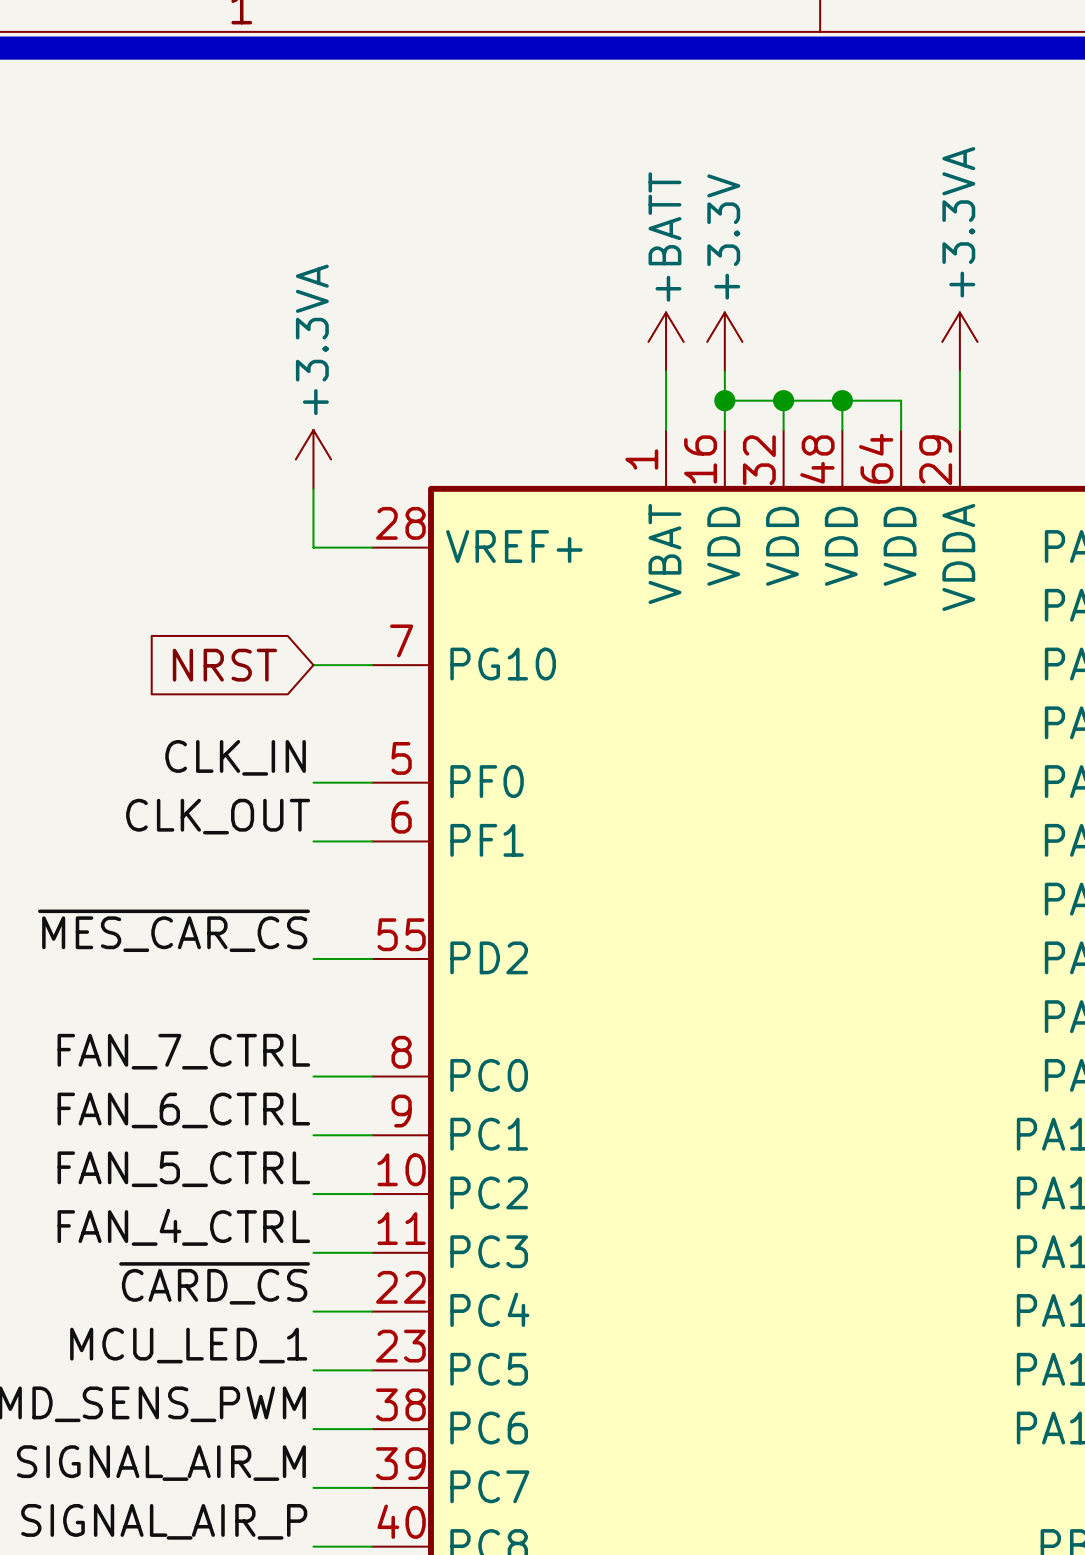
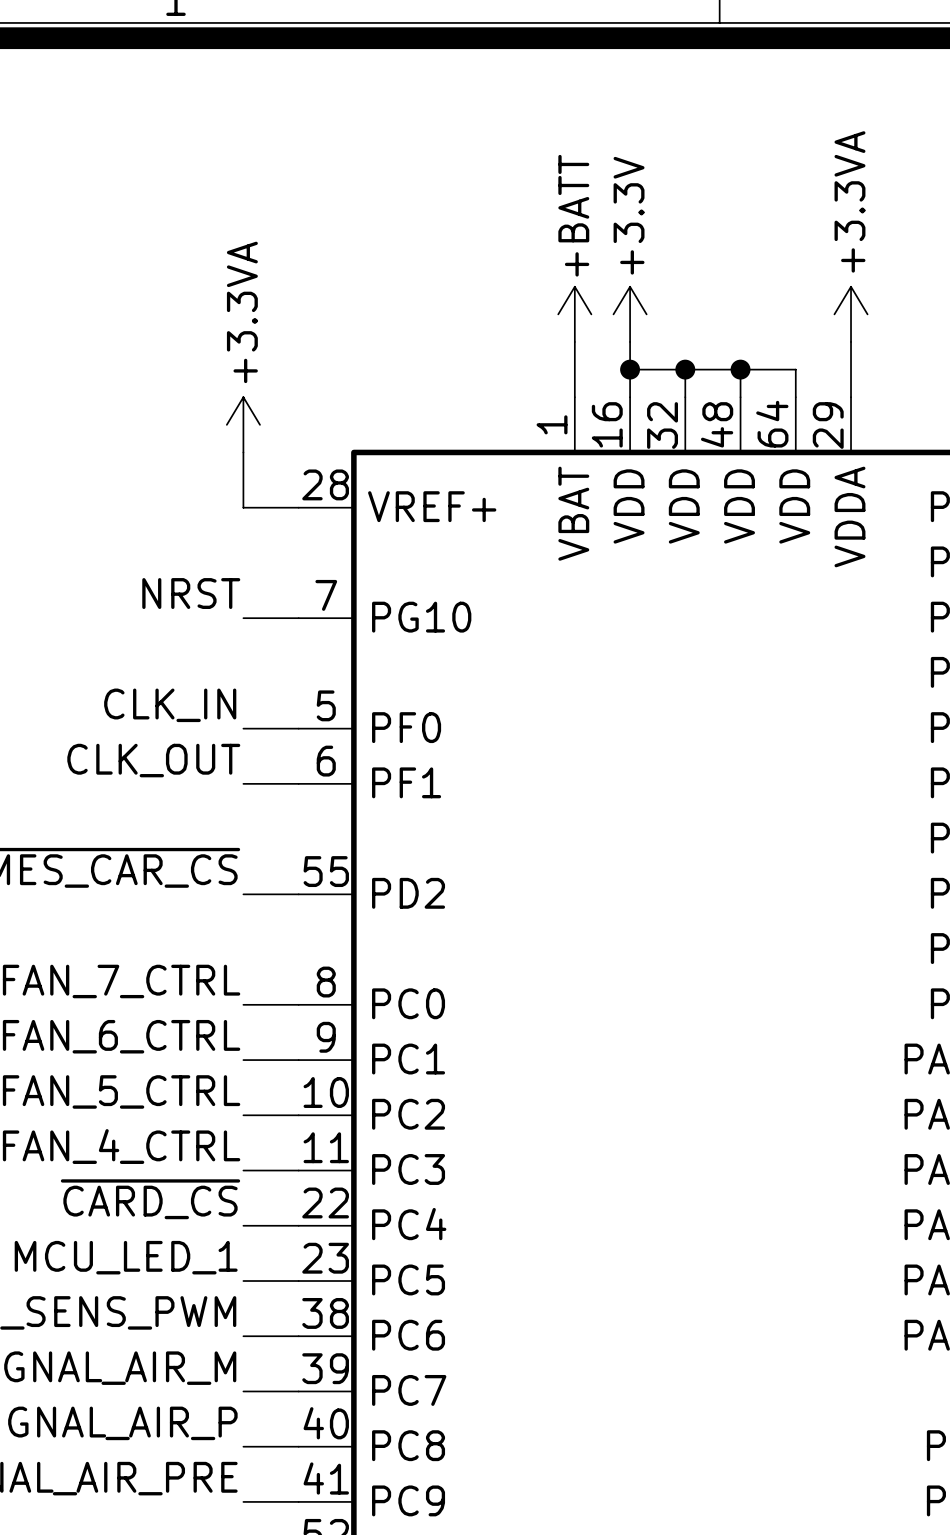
label: none -> NRST (191, 593)
global label: NRST (224, 665) -> none

